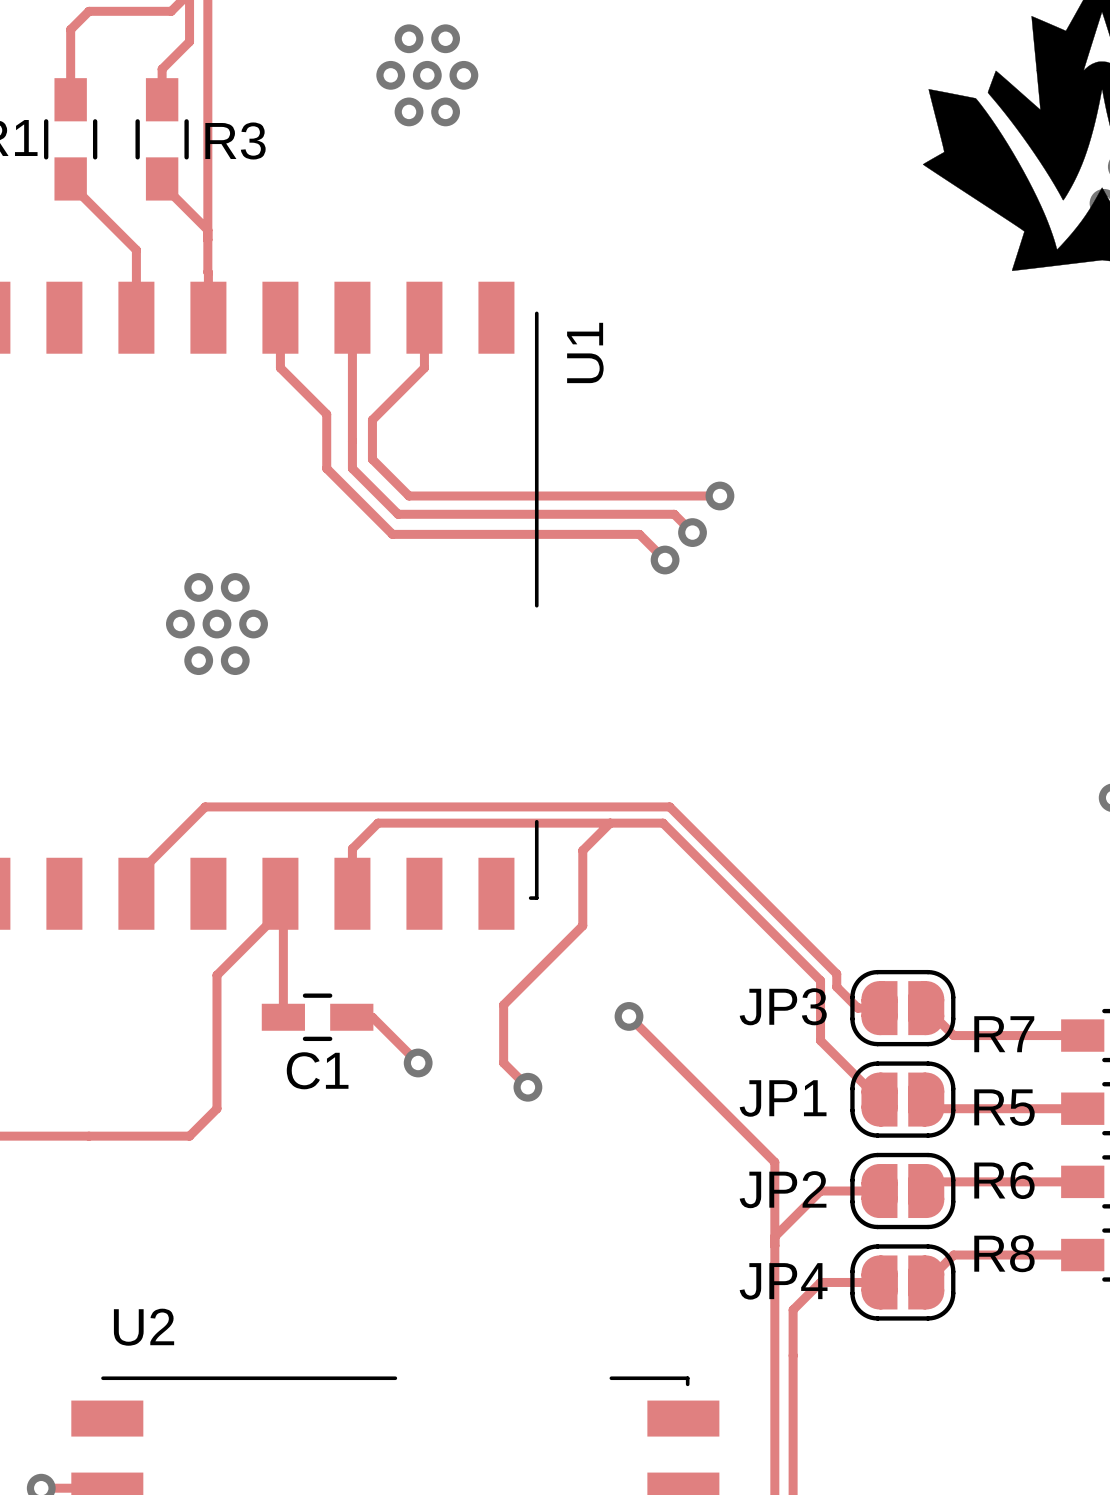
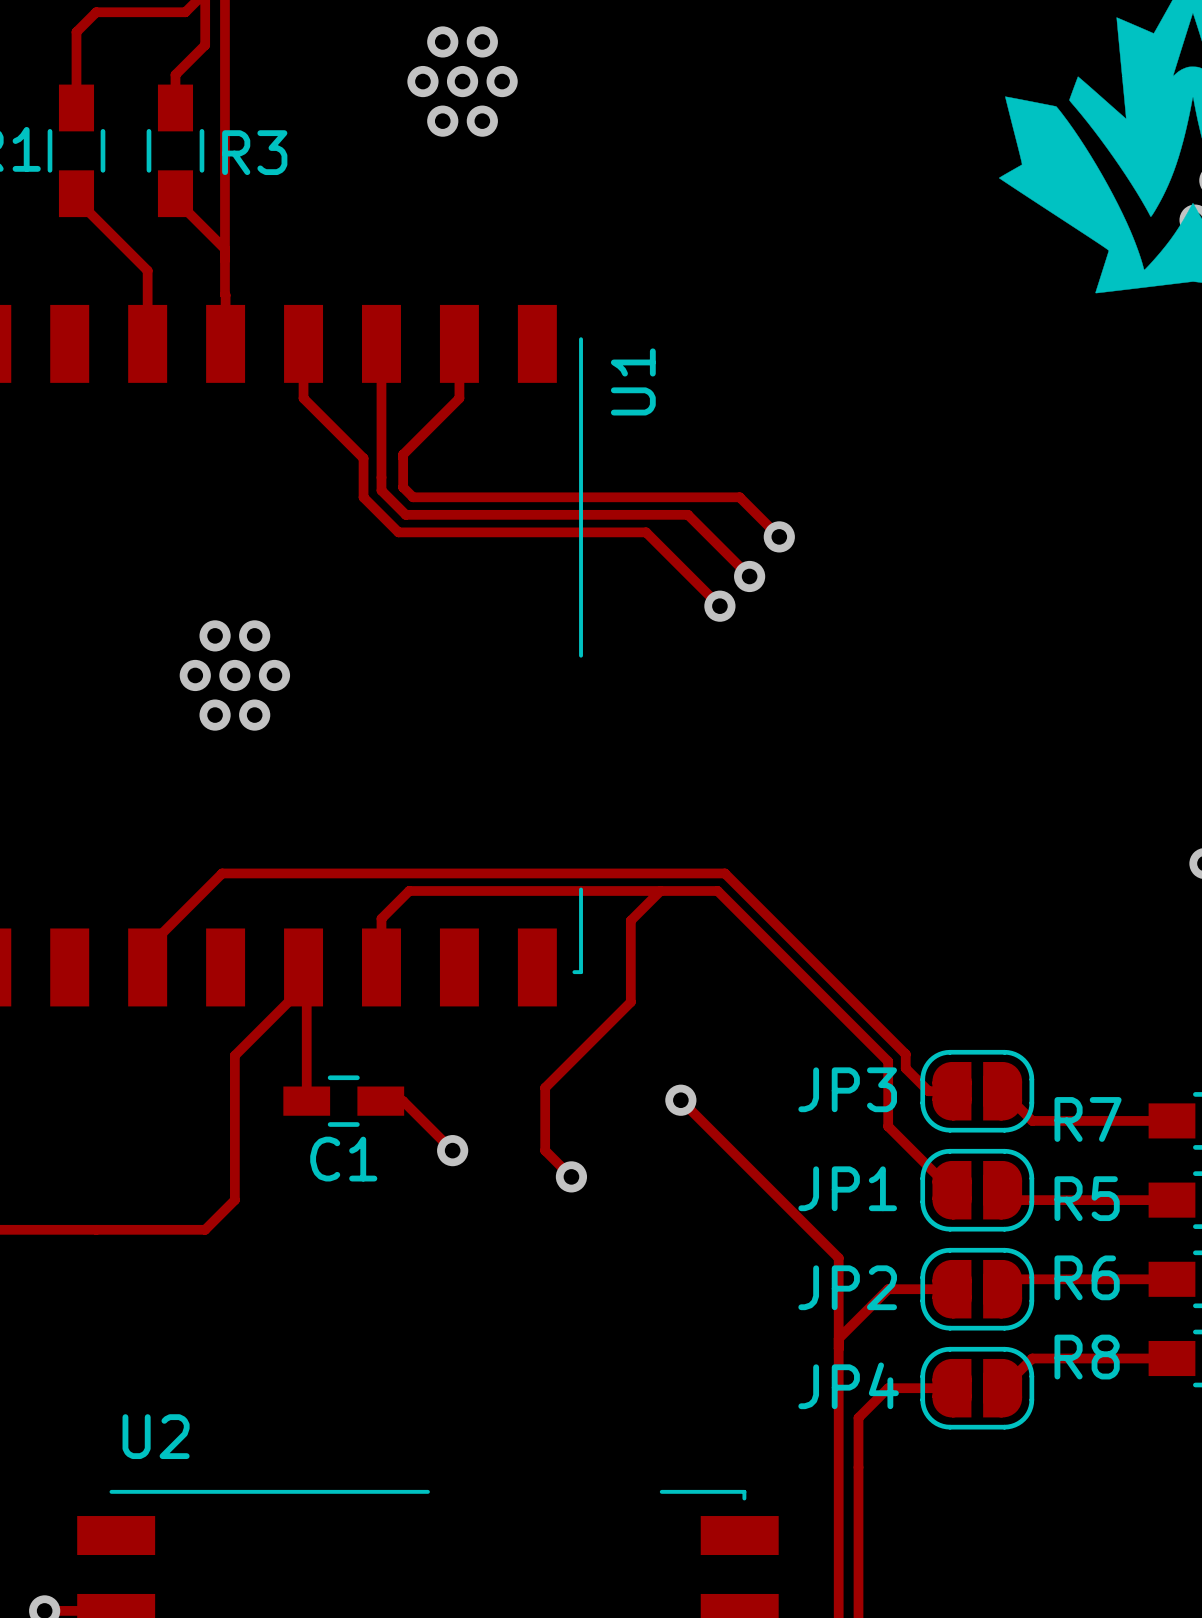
track: (326, 414) (326, 468) (392, 534) (639, 534) -> (353, 448) (363, 458) (363, 497) (398, 532) (646, 532) (692, 578)
track: (372, 450) (372, 459) (409, 496) (710, 496) -> (403, 487) (413, 497) (739, 497) (779, 536)
track: (352, 453) (352, 468) (398, 514) (674, 514) -> (381, 490) (405, 514) (687, 514) (729, 556)

